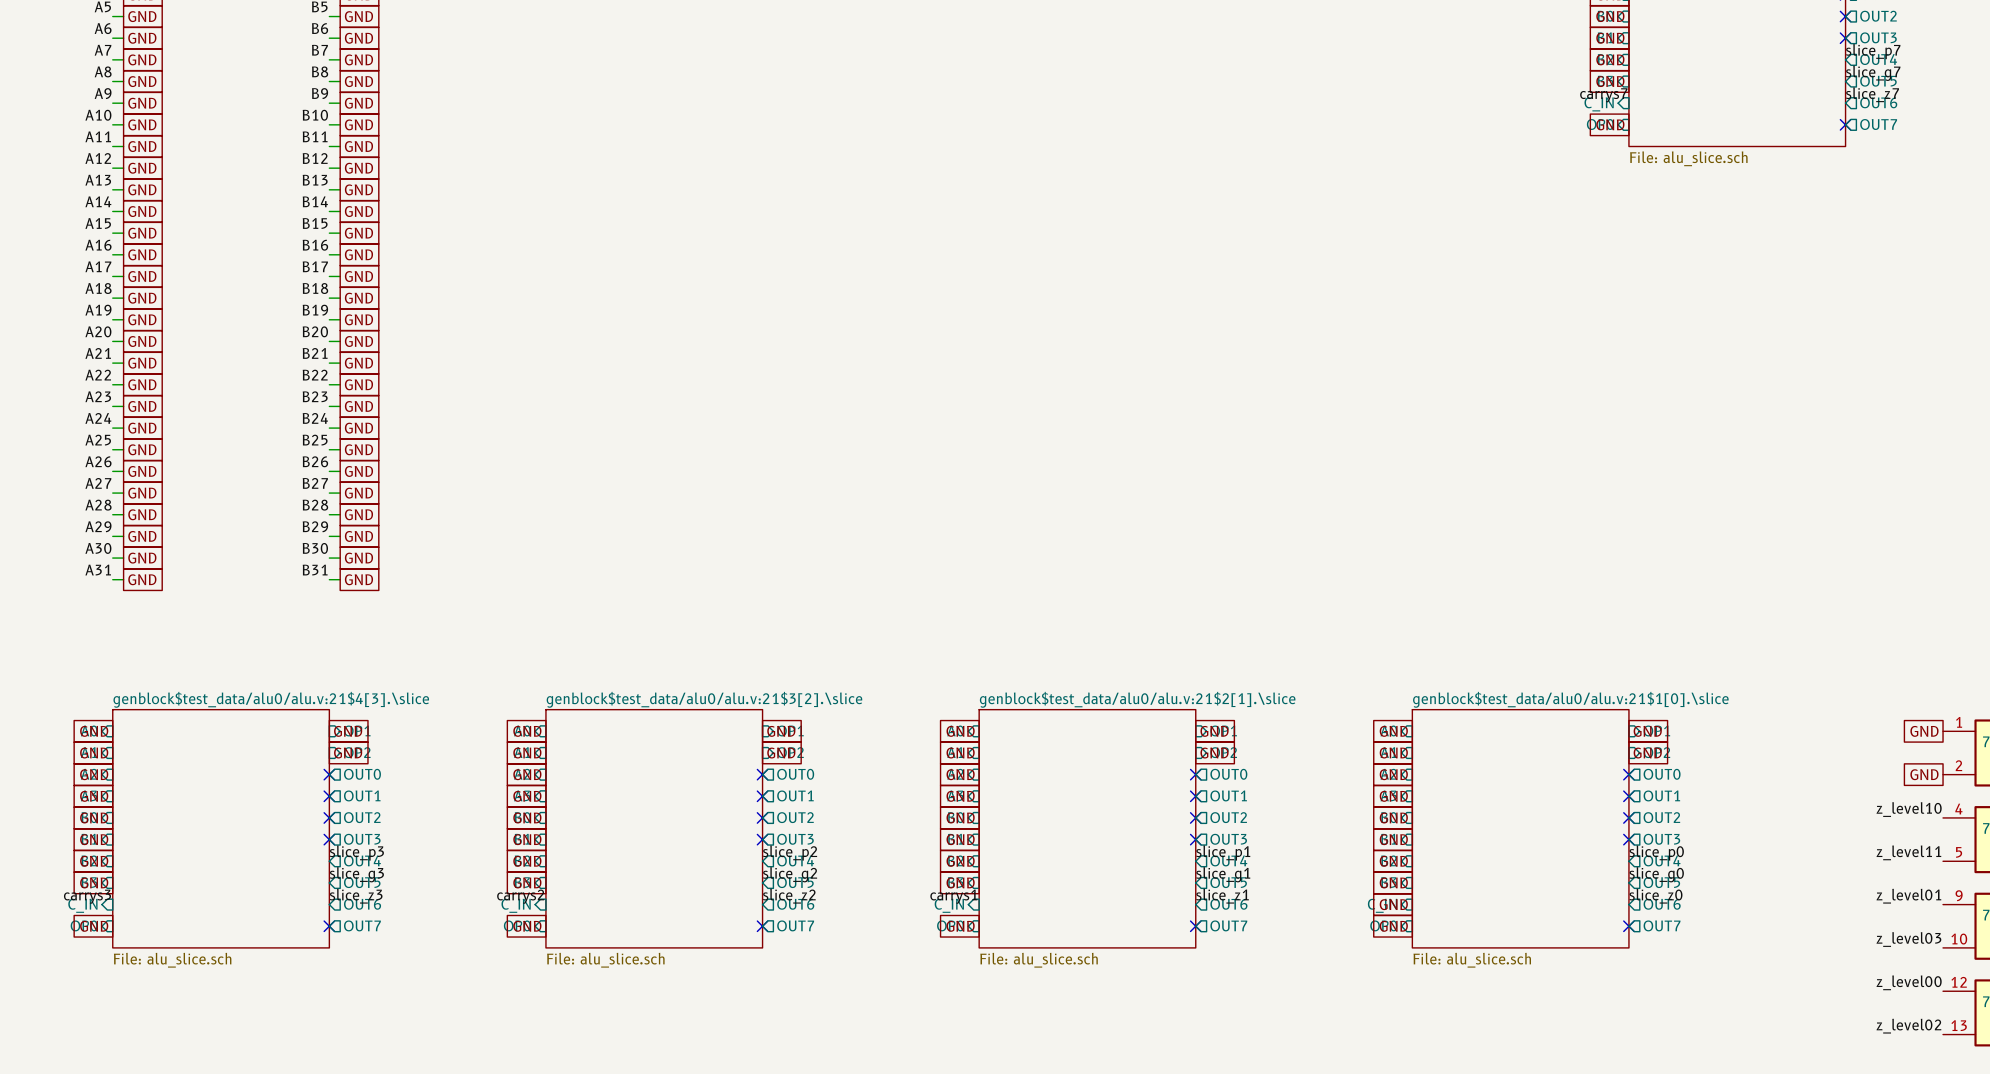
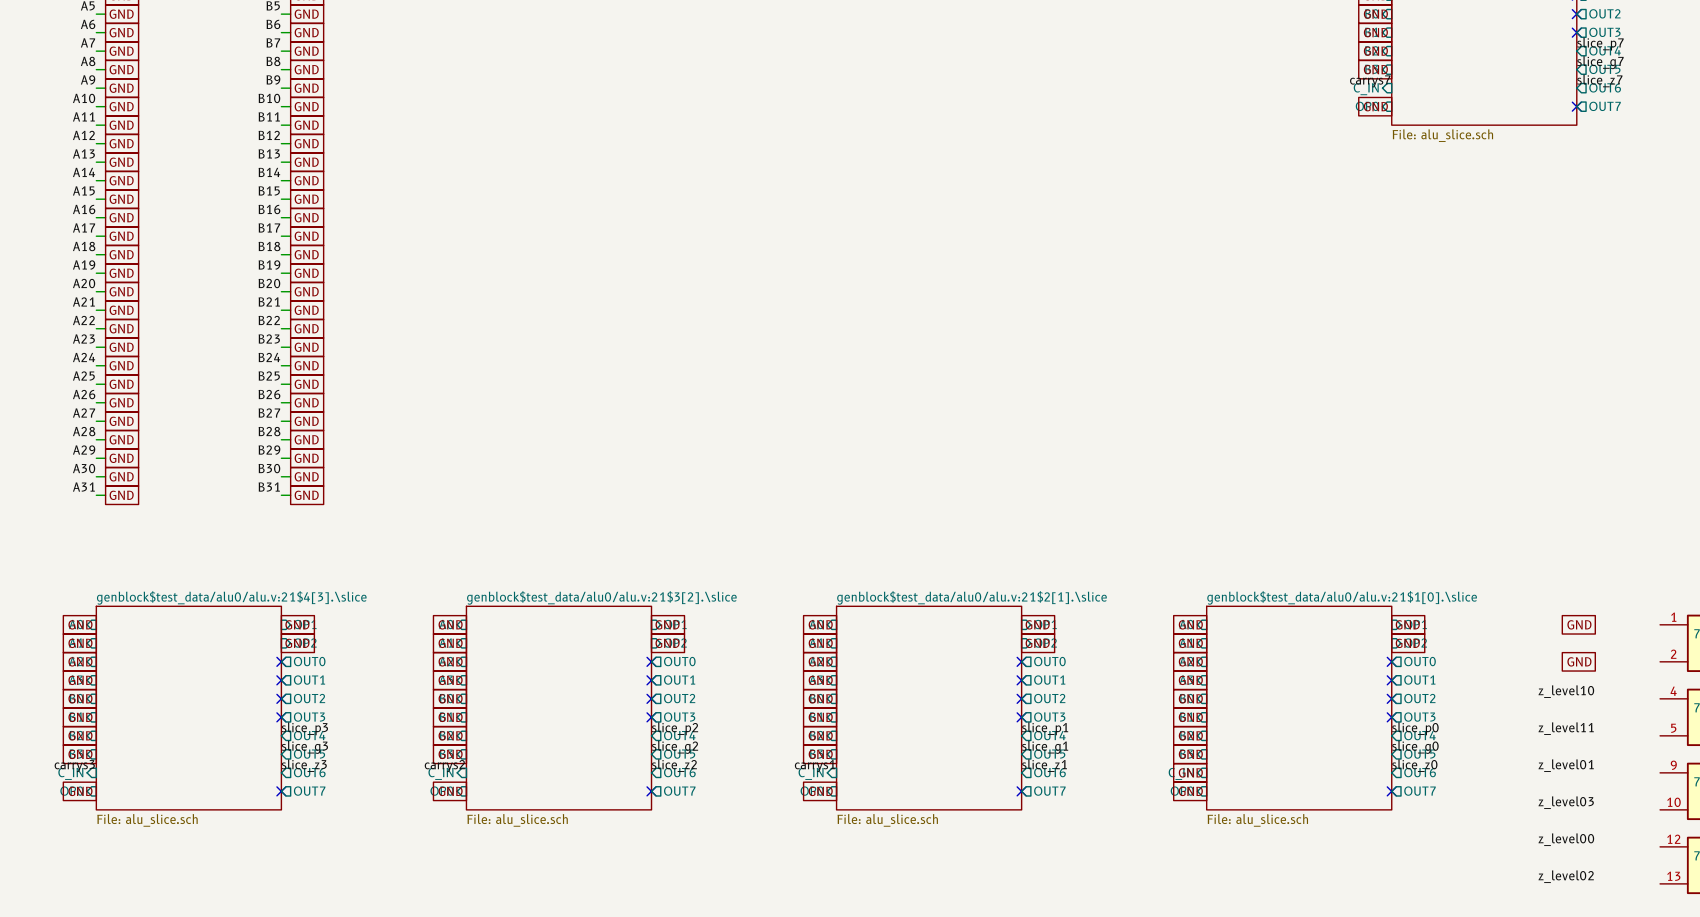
global label: none -> GND (1579, 624)
global label: GND (1924, 731) -> none
global label: none -> GND (1579, 661)
global label: GND (1924, 774) -> none
label position: z_level10 (1909, 809) -> z_level10 (1566, 691)
label position: z_level11 (1908, 852) -> z_level11 (1566, 728)
label position: z_level01 (1908, 896) -> z_level01 (1566, 765)
label position: z_level03 (1908, 939) -> z_level03 (1566, 802)
label position: z_level00 (1909, 982) -> z_level00 (1566, 839)
label position: z_level02 (1908, 1026) -> z_level02 (1566, 876)

